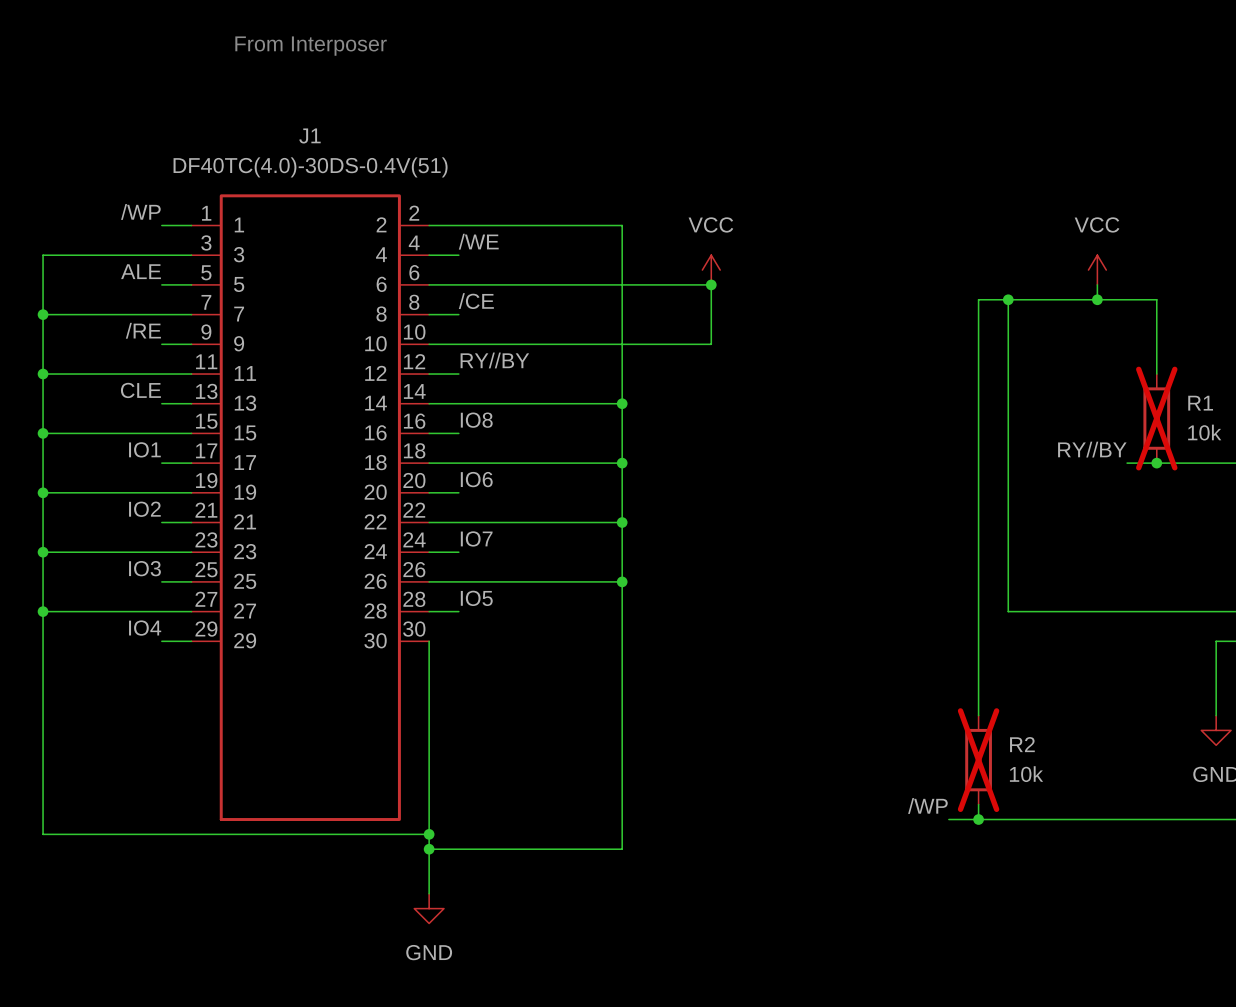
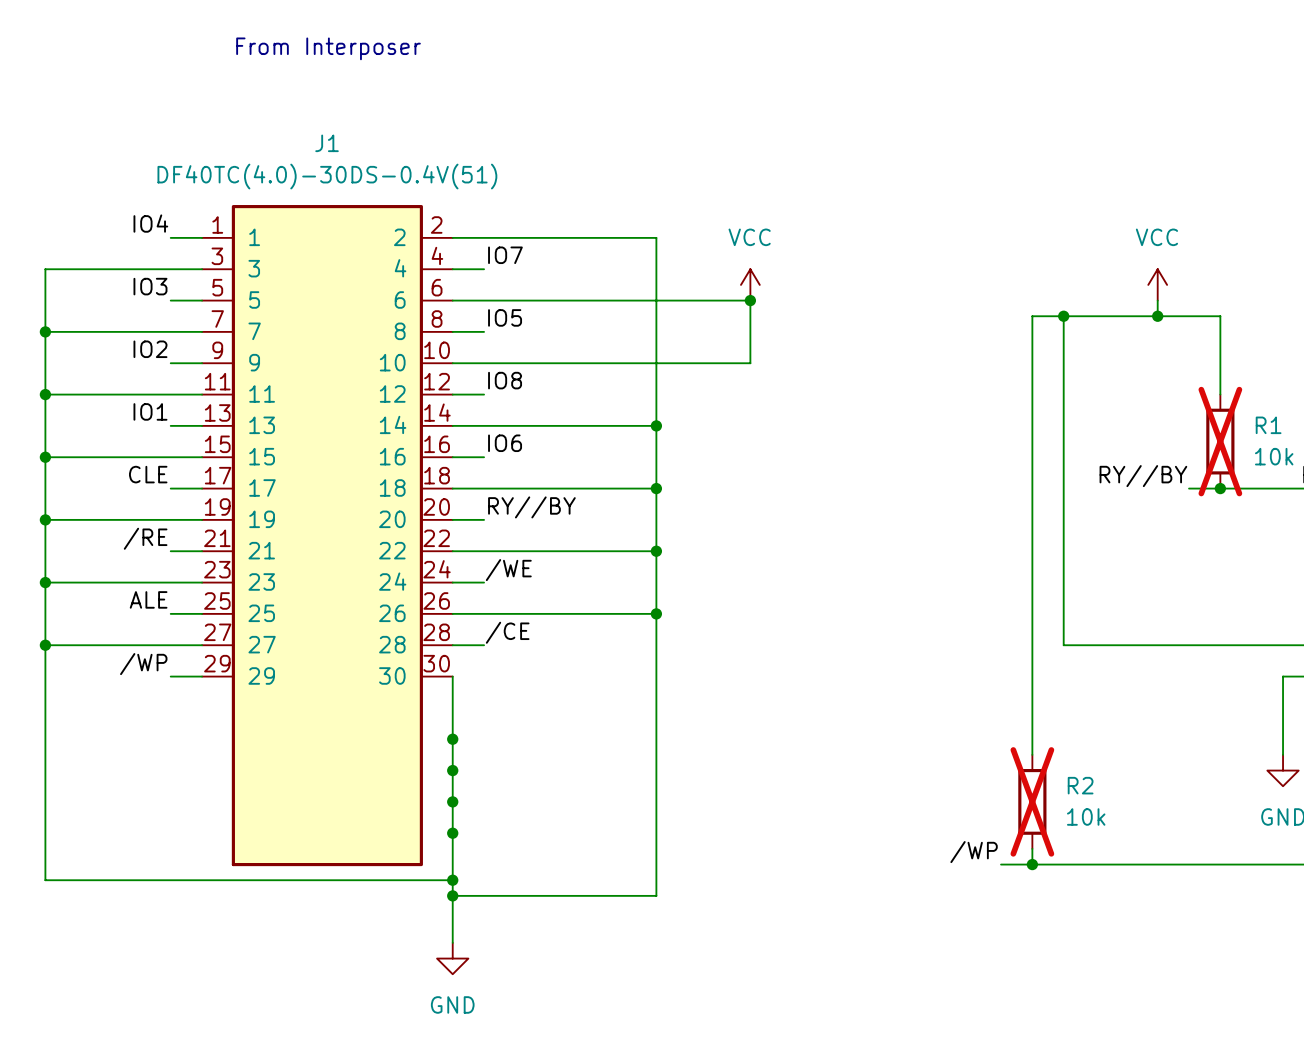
label: /WP (140, 211) -> IO4 (150, 223)
label: /WE (478, 241) -> IO7 (505, 255)
label: ALE (140, 271) -> IO3 (150, 286)
label: /CE (476, 301) -> IO5 (505, 317)
label: /RE (143, 330) -> IO2 (150, 349)
label: RY//BY (494, 360) -> IO8 (505, 380)
label: CLE (140, 390) -> IO1 (150, 411)
label: IO8 (476, 420) -> IO6 (505, 443)
label: IO1 (144, 449) -> CLE (148, 474)
label: IO6 (476, 479) -> RY//BY (531, 507)
label: IO2 (144, 509) -> /RE (145, 538)
label: IO7 (476, 538) -> /WE (508, 570)
label: IO3 (144, 568) -> ALE (148, 599)
label: IO5 (476, 598) -> /CE (507, 632)
label: IO4 (145, 628) -> /WP (143, 664)
junction: none -> (452, 739)
junction: none -> (452, 770)
junction: none -> (452, 801)
junction: none -> (452, 833)

